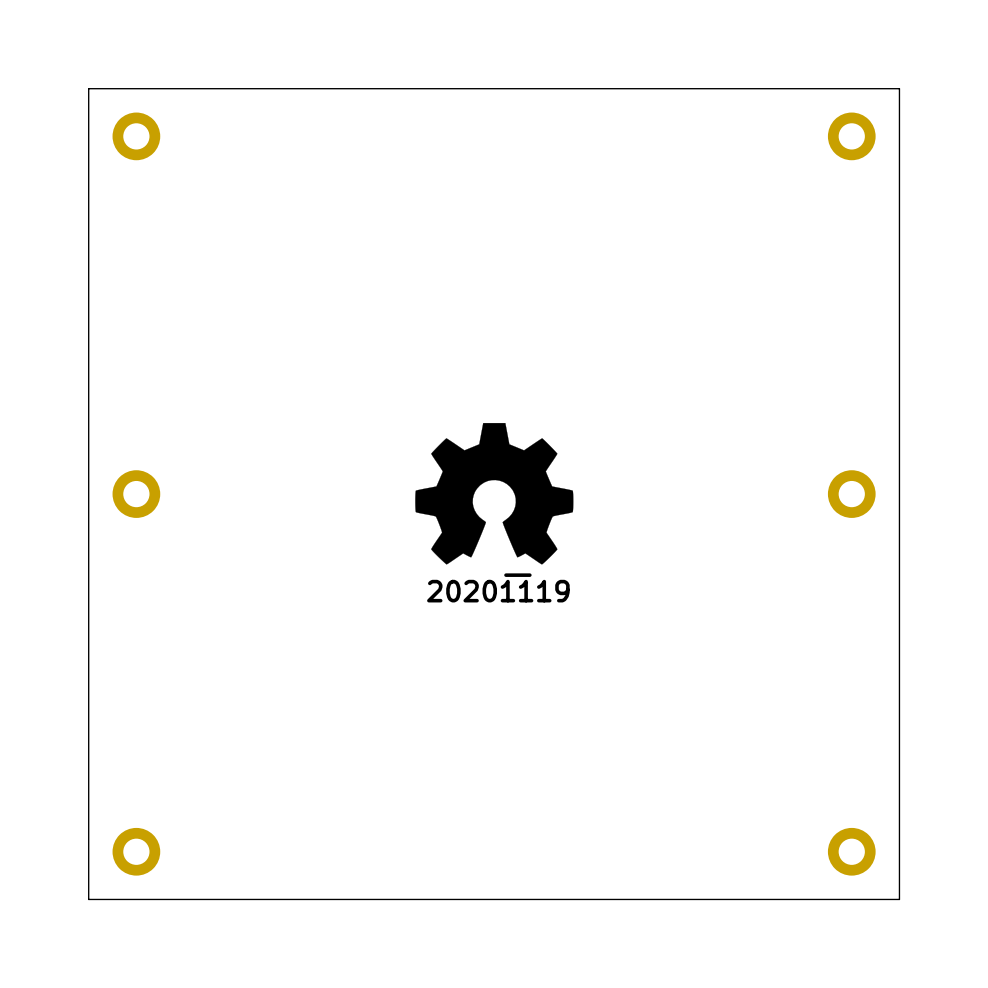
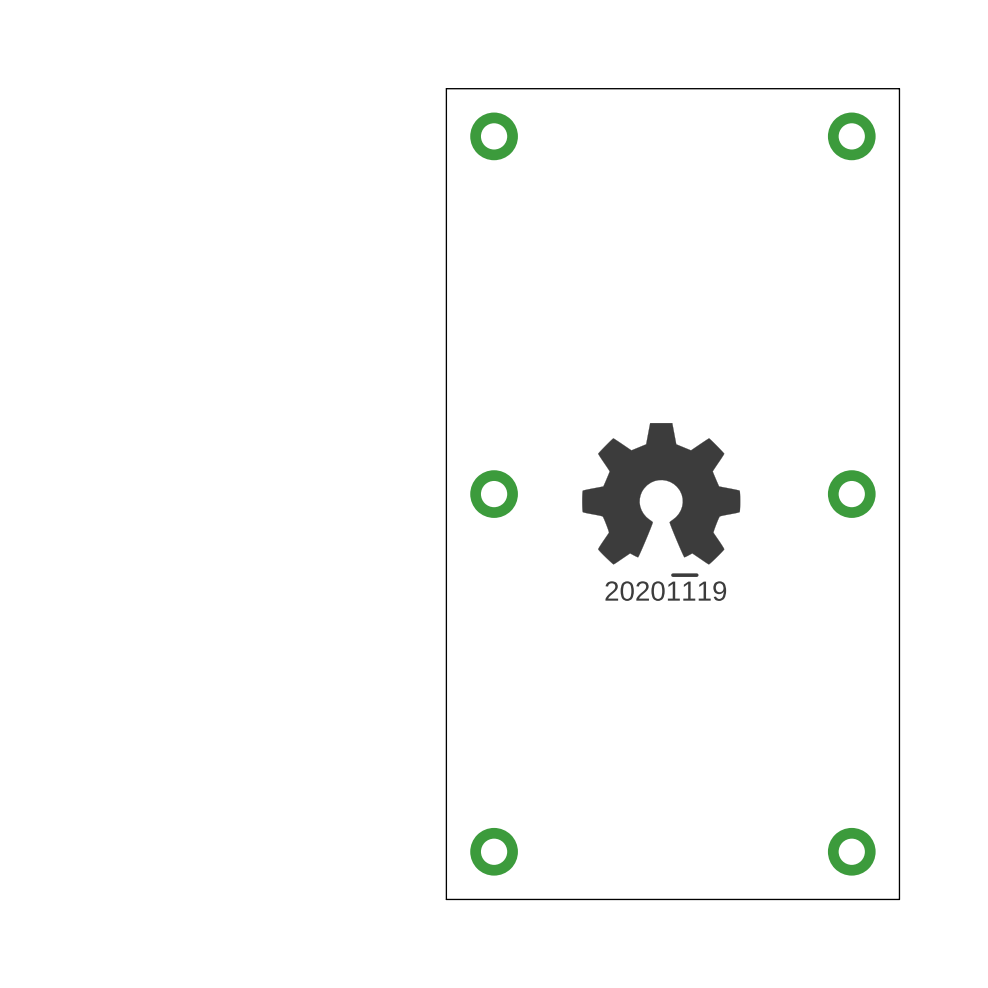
board edge: (446, 88) (88, 88) (88, 899) (446, 899) -> (446, 88) (446, 899)
part: (136, 136) -> none
part: none -> (494, 136)
drawing position: (494, 493) -> (661, 493)
part: (136, 494) -> none
part: none -> (494, 494)
drawing position: (517, 575) -> (684, 575)
part: (136, 851) -> none
part: none -> (494, 851)

